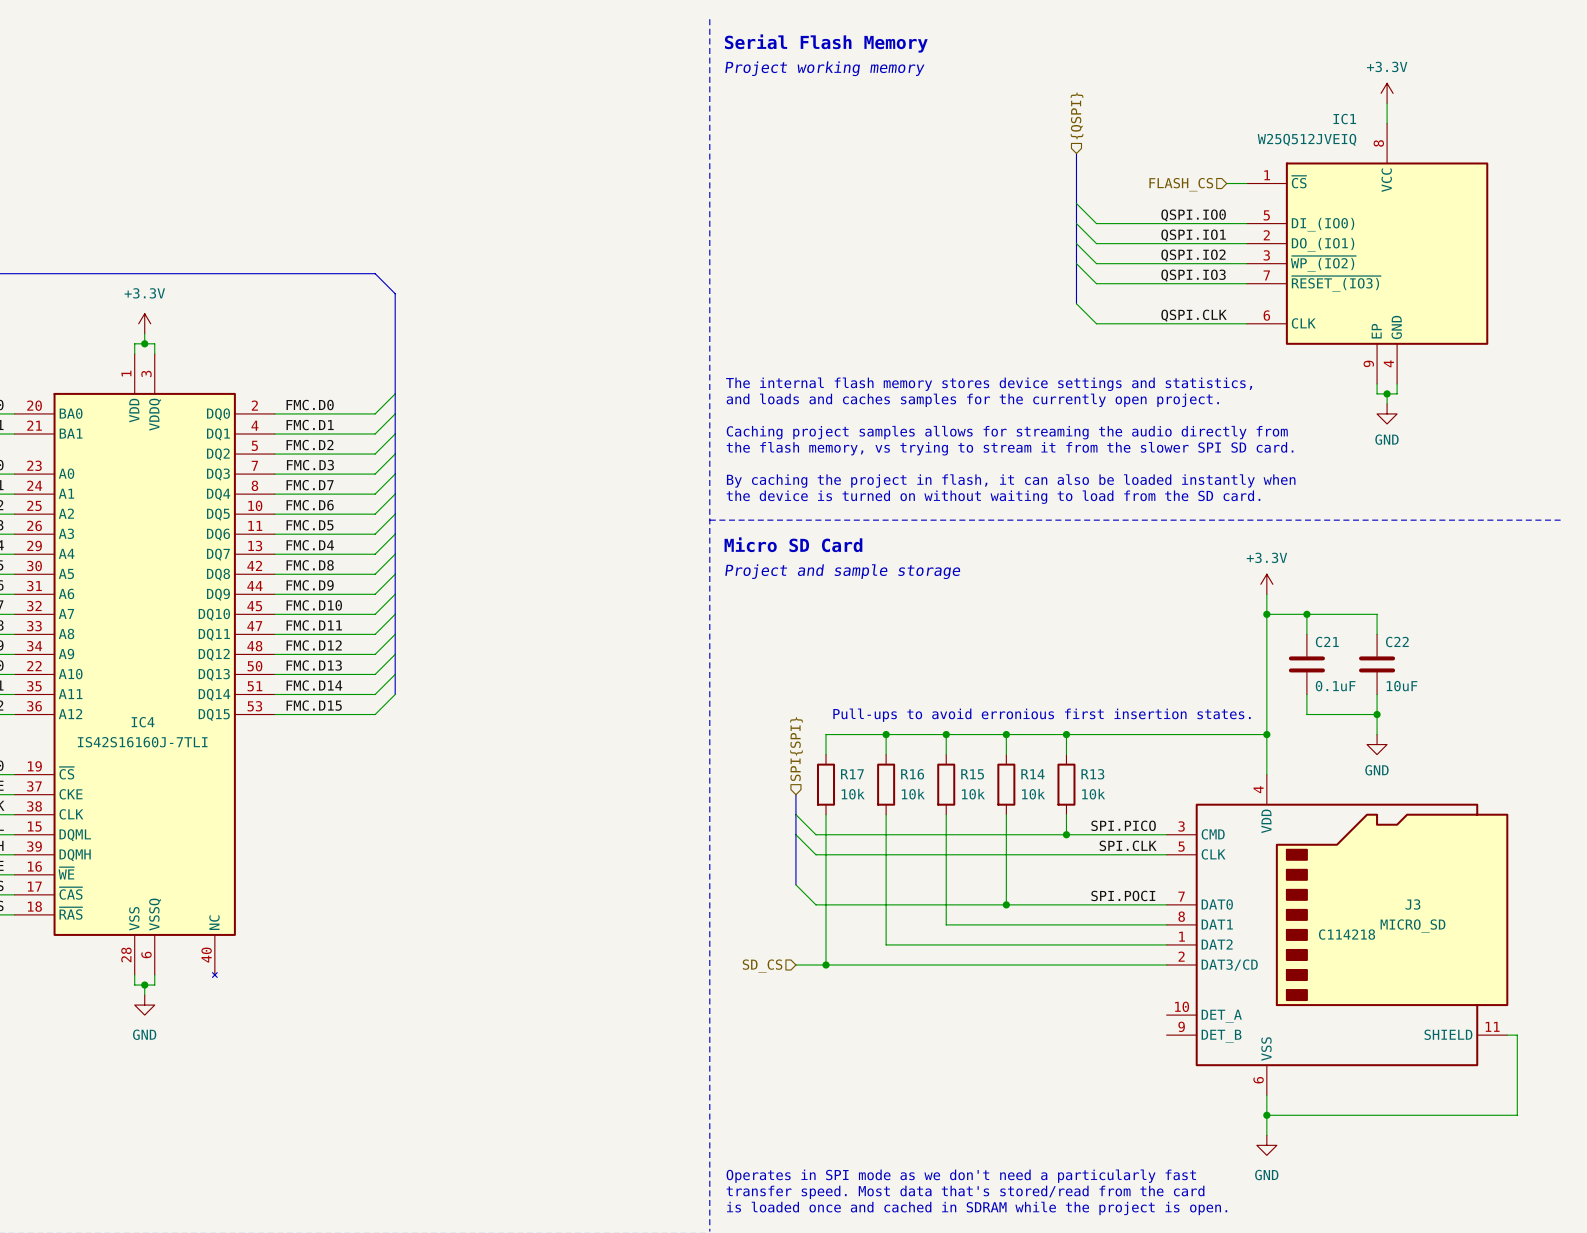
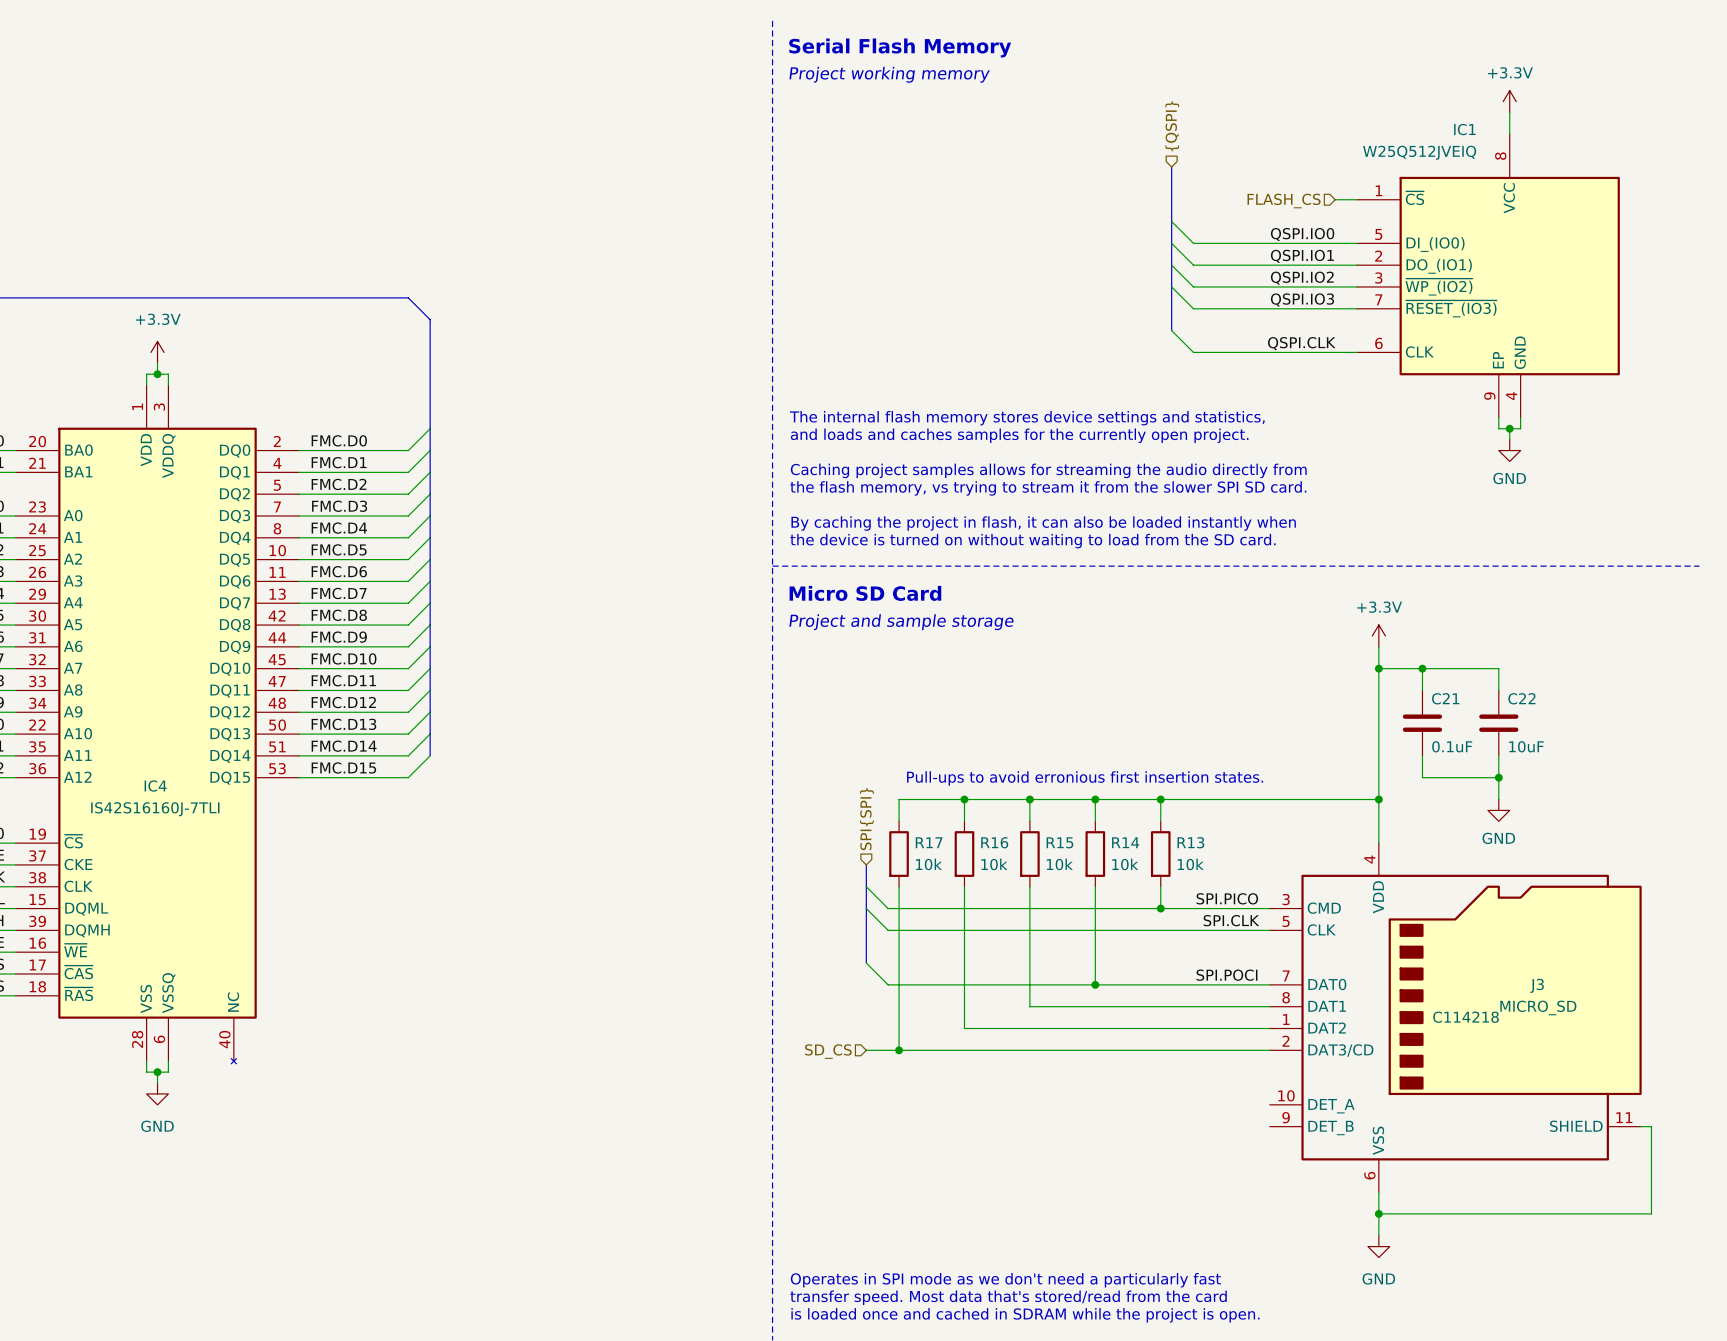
label: FMC.D7 (310, 485) -> FMC.D4 (339, 528)
label: FMC.D6 (310, 505) -> FMC.D5 (339, 549)
label: FMC.D5 (310, 525) -> FMC.D6 (339, 571)
label: FMC.D4 (310, 545) -> FMC.D7 (339, 593)

